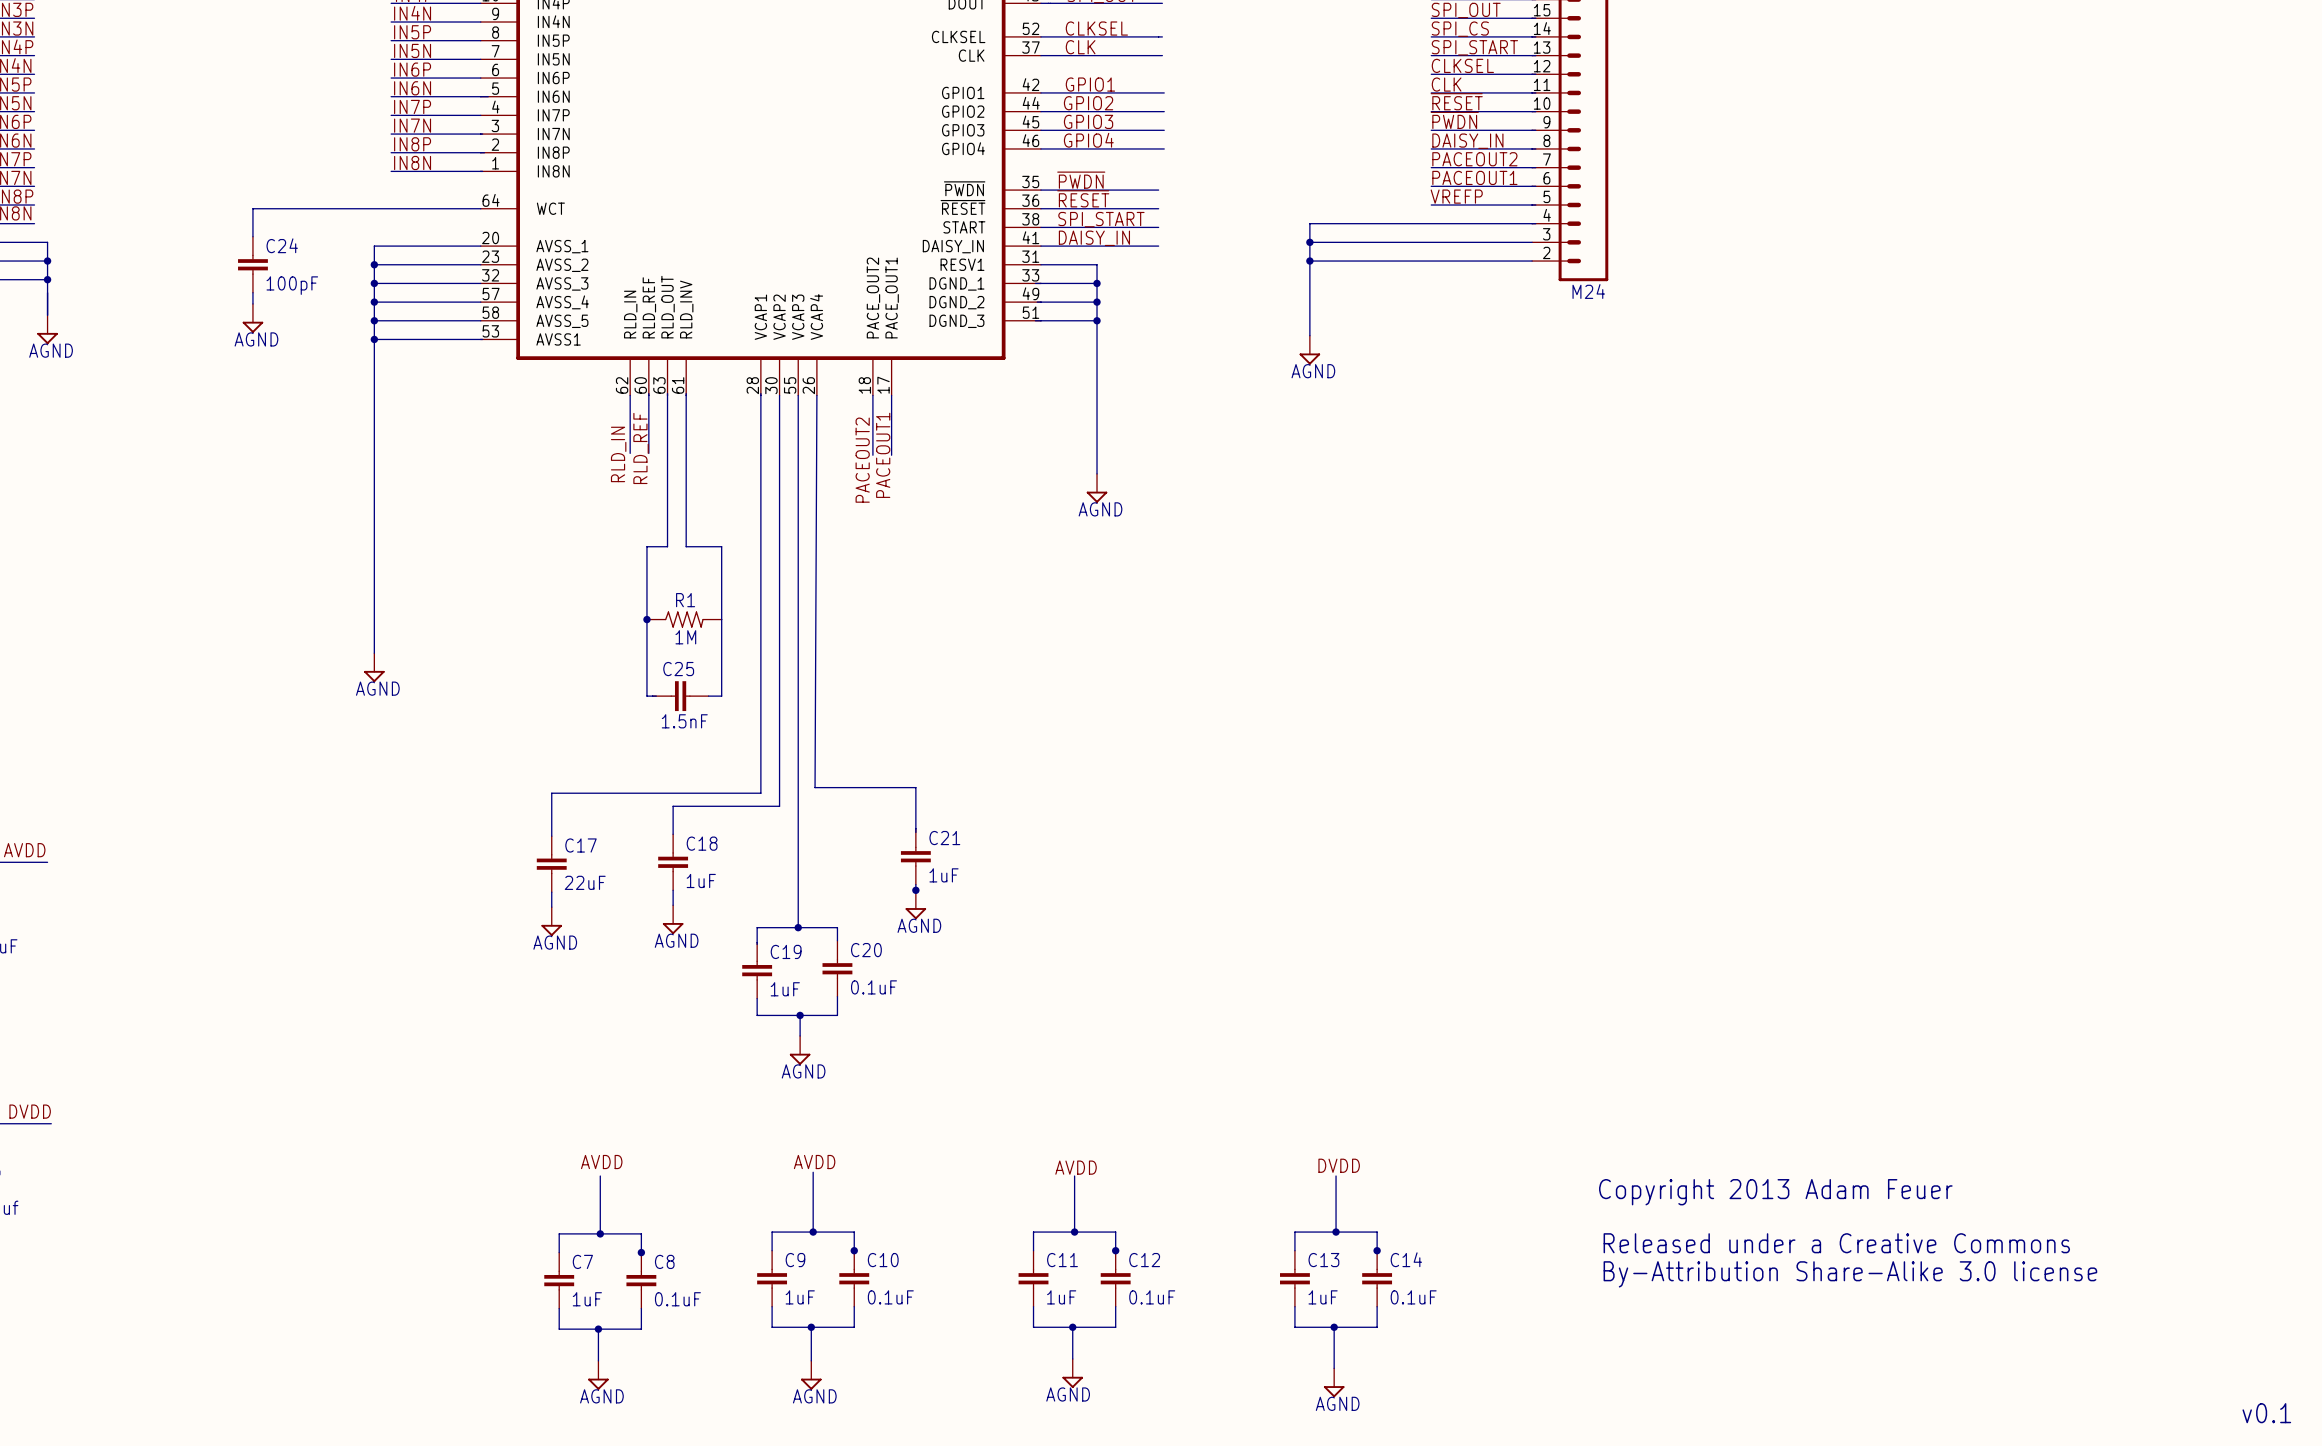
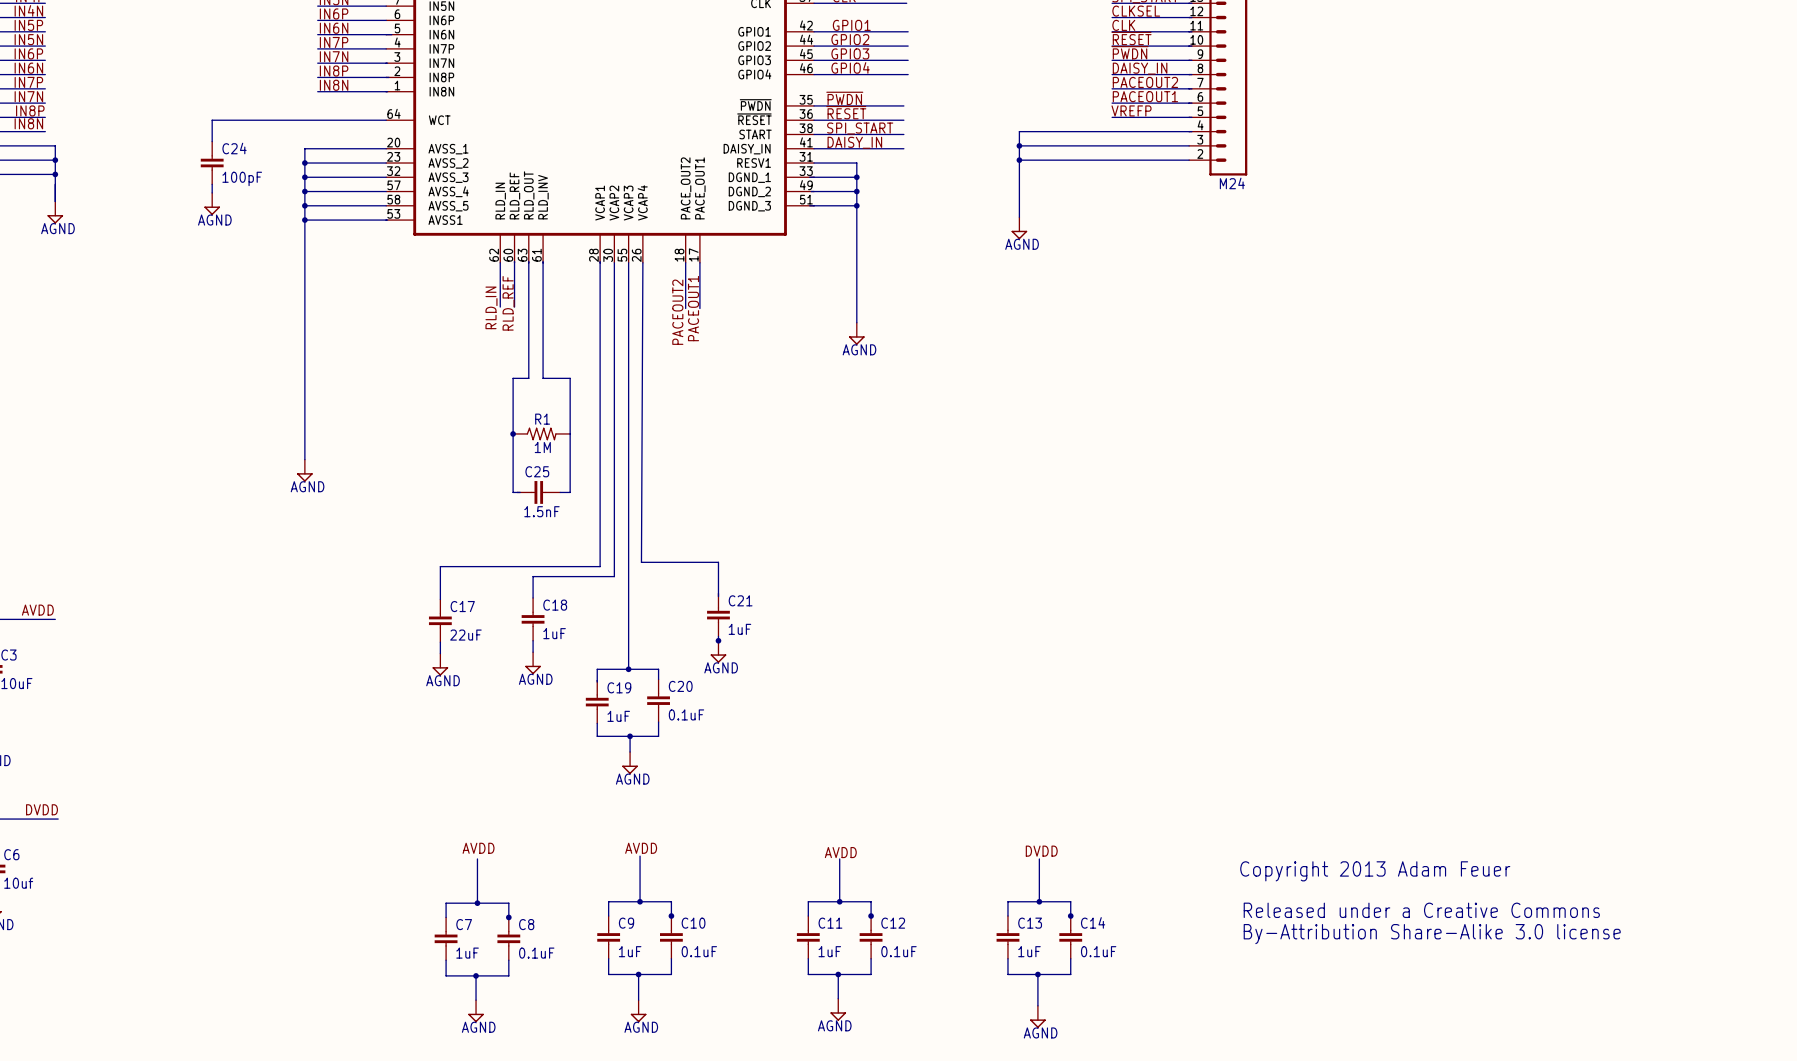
text: v0.1 (2266, 1413) -> none

